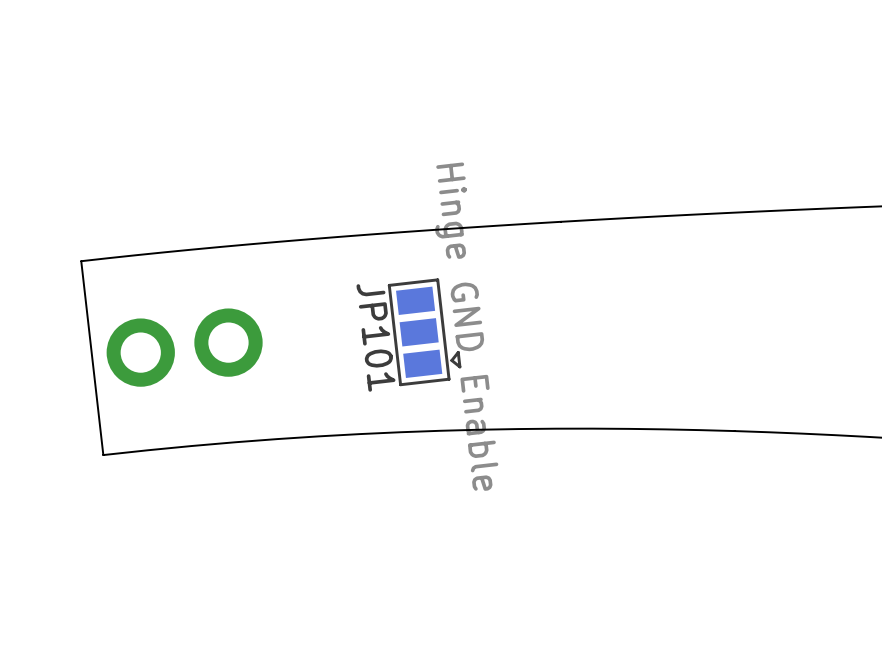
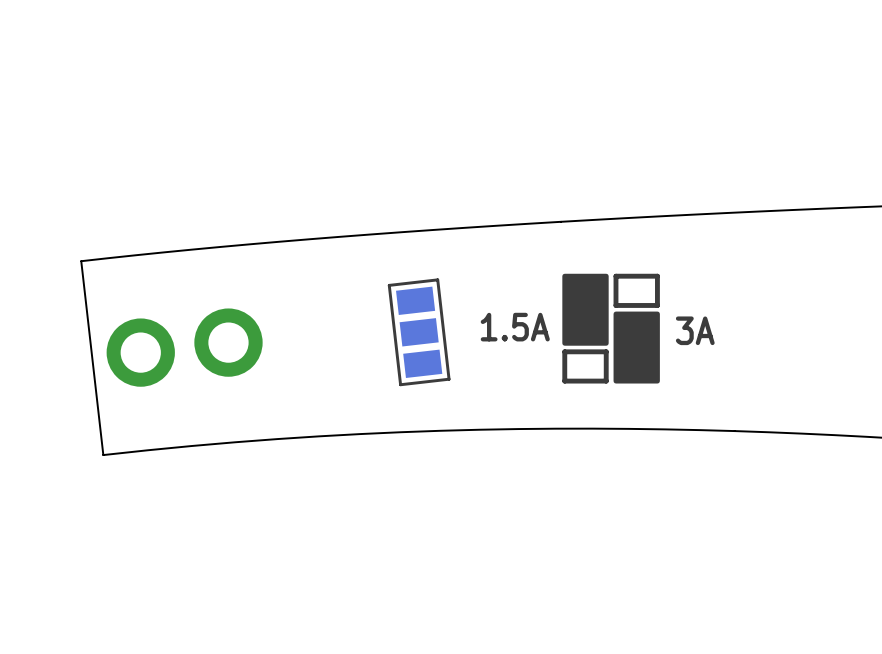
drawing: none -> [562, 273, 660, 384]
line: none -> (657, 276) (657, 305) (615, 305) (615, 276) (657, 276)
text: none -> 1.5A (515, 327)
text: none -> 3A (695, 330)
part: none -> (419, 332)
JP101: Hinge GND Enable (424, 332) -> none
line: none -> (606, 351) (606, 381) (564, 381) (564, 351) (606, 351)

